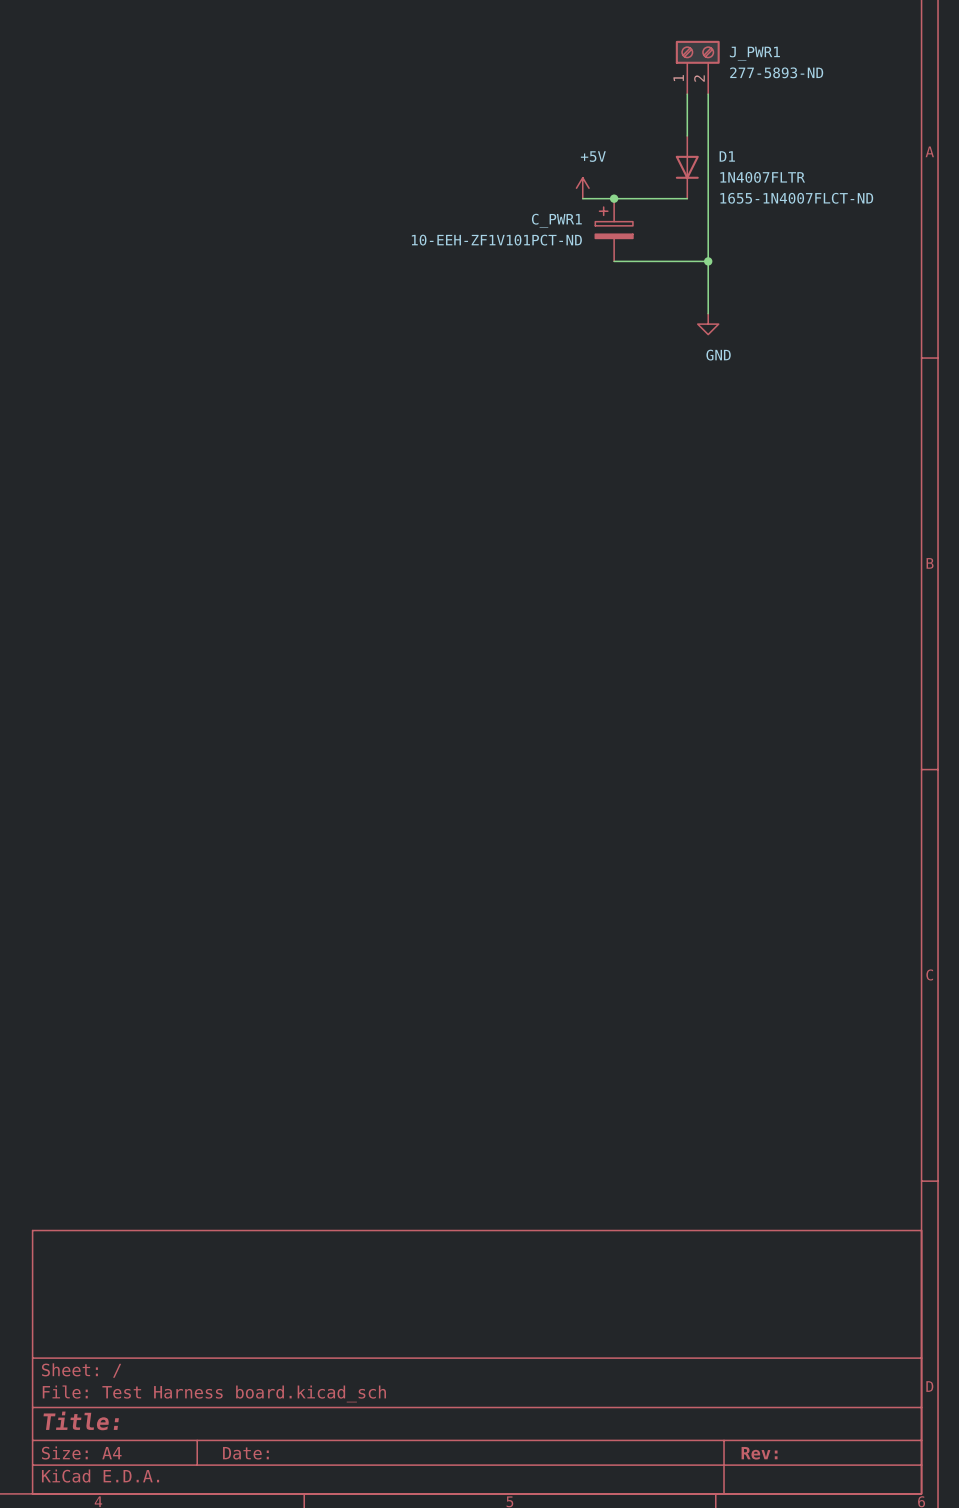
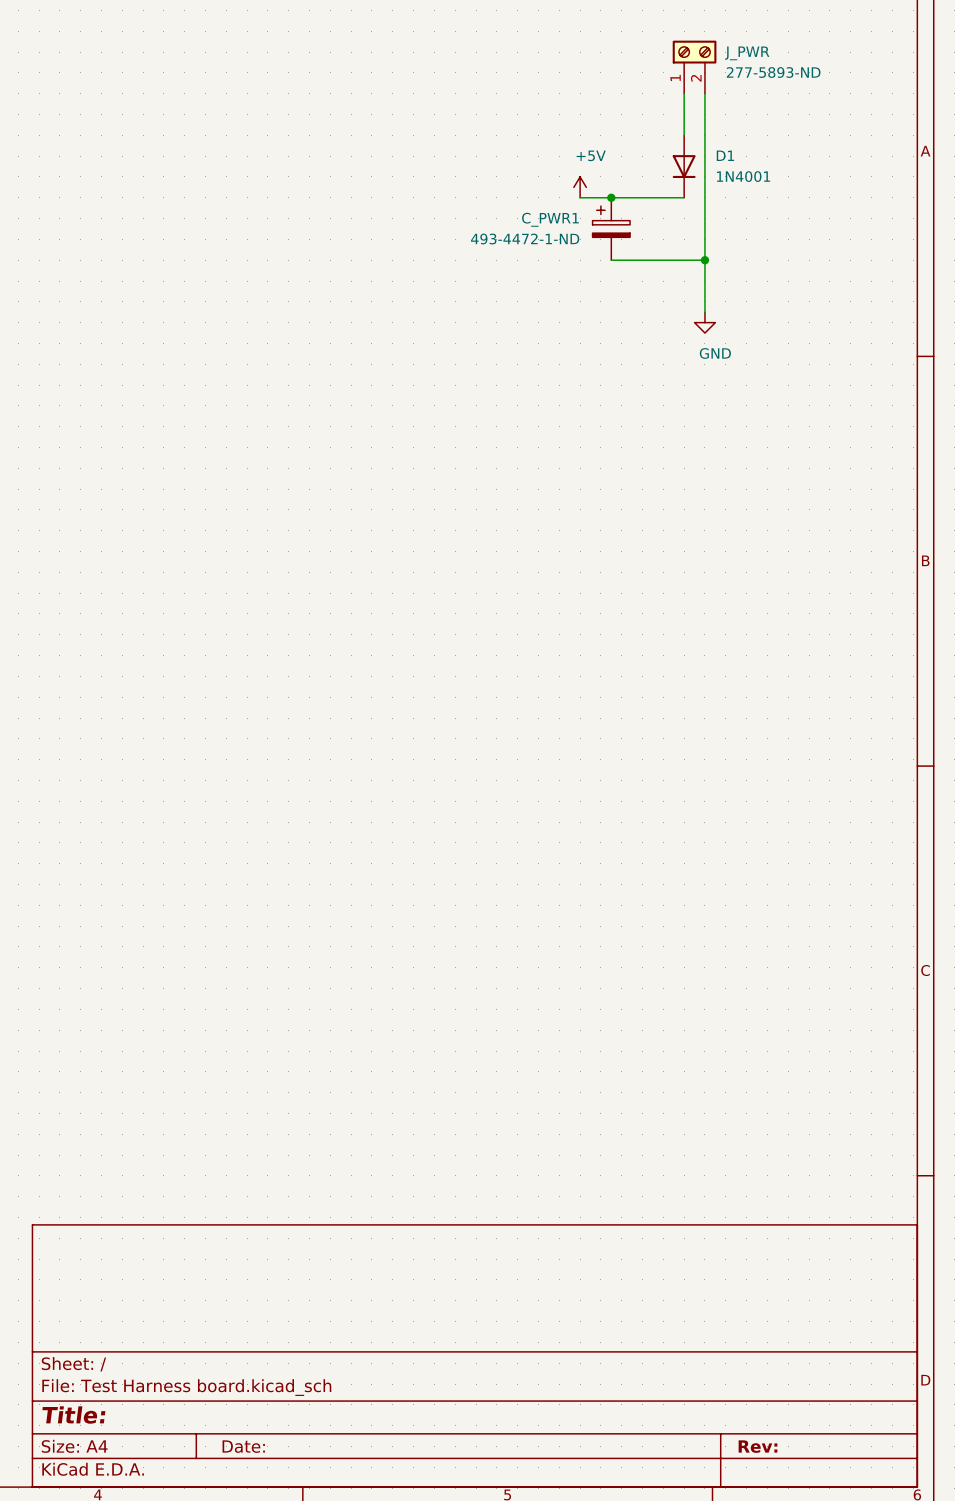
J_PWR1 name: J_PWR1 (754, 53) -> J_PWR (747, 53)
D1 value: 1N4007FLTR (762, 177) -> 1N4001 (743, 176)
D1 text: 1655-1N4007FLCT-ND (796, 198) -> none
C_PWR1 text: 10-EEH-ZF1V101PCT-ND (496, 240) -> 493-4472-1-ND (525, 239)

